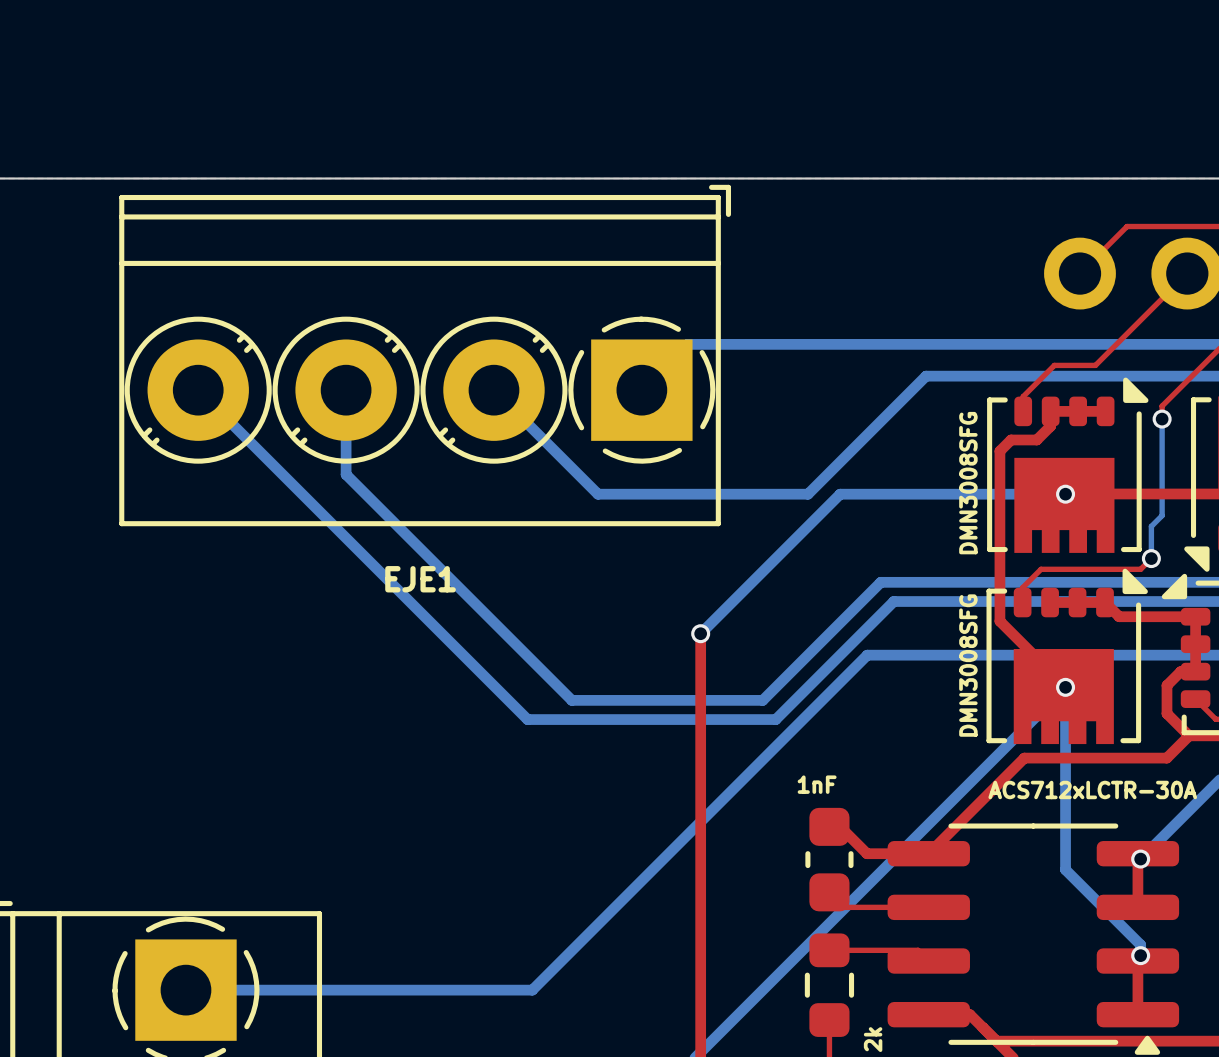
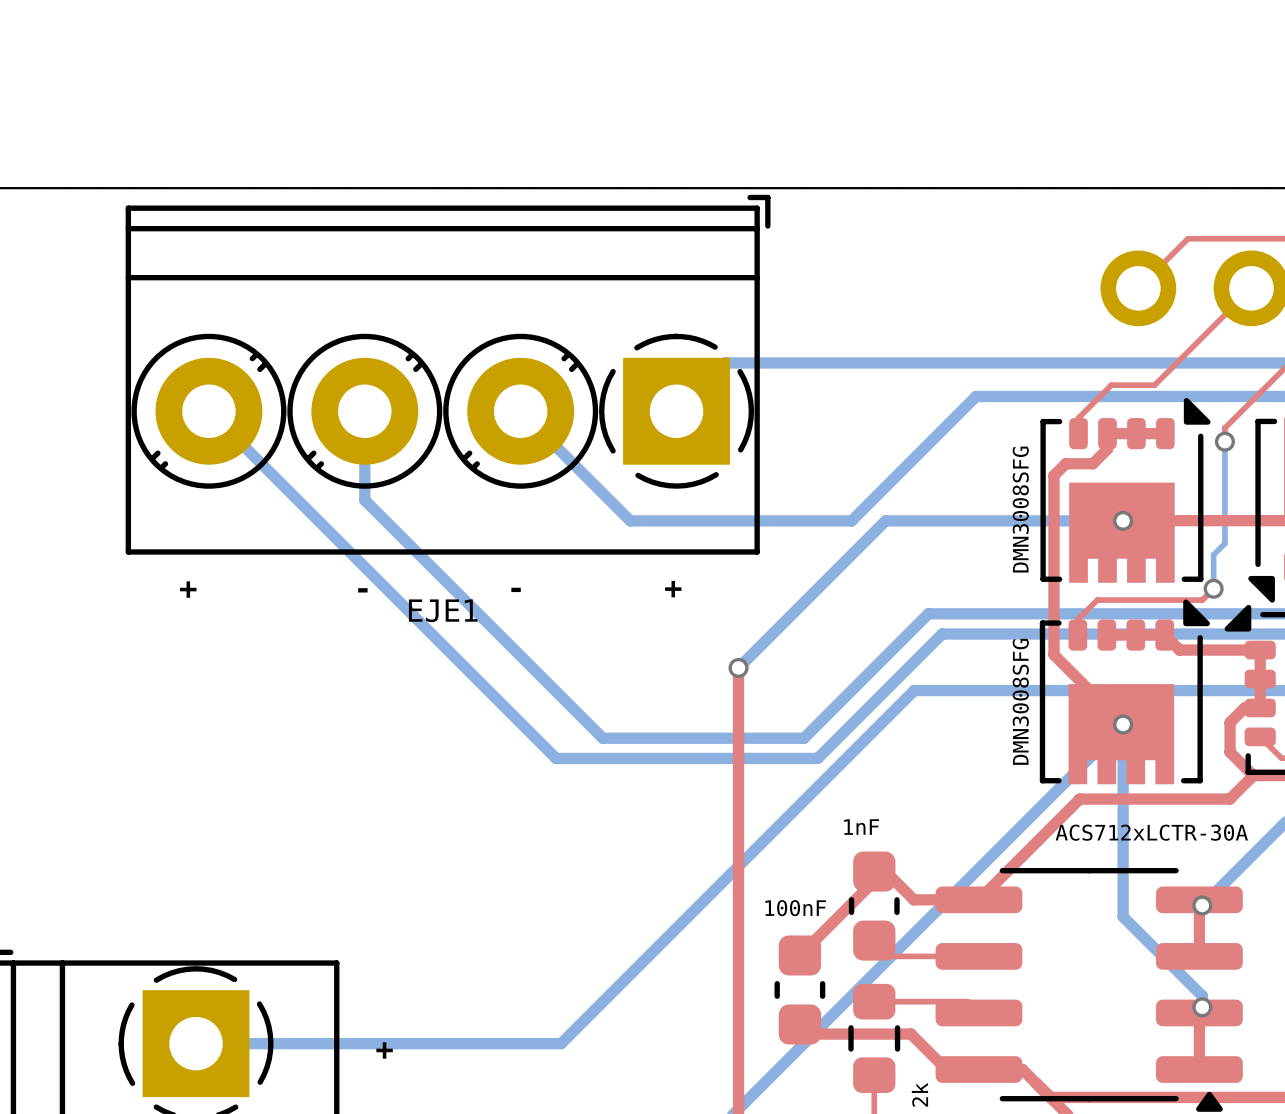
text: none -> - (516, 589)
text: none -> + (673, 589)
text: none -> + (188, 589)
text: none -> - (362, 590)
top track: none -> (874, 871) (874, 881) (799, 955)
part: none -> 100nF (799, 989)
top track: none -> (799, 1024) (809, 1034) (911, 1034) (946, 1069) (978, 1069)
text: none -> + (384, 1050)

